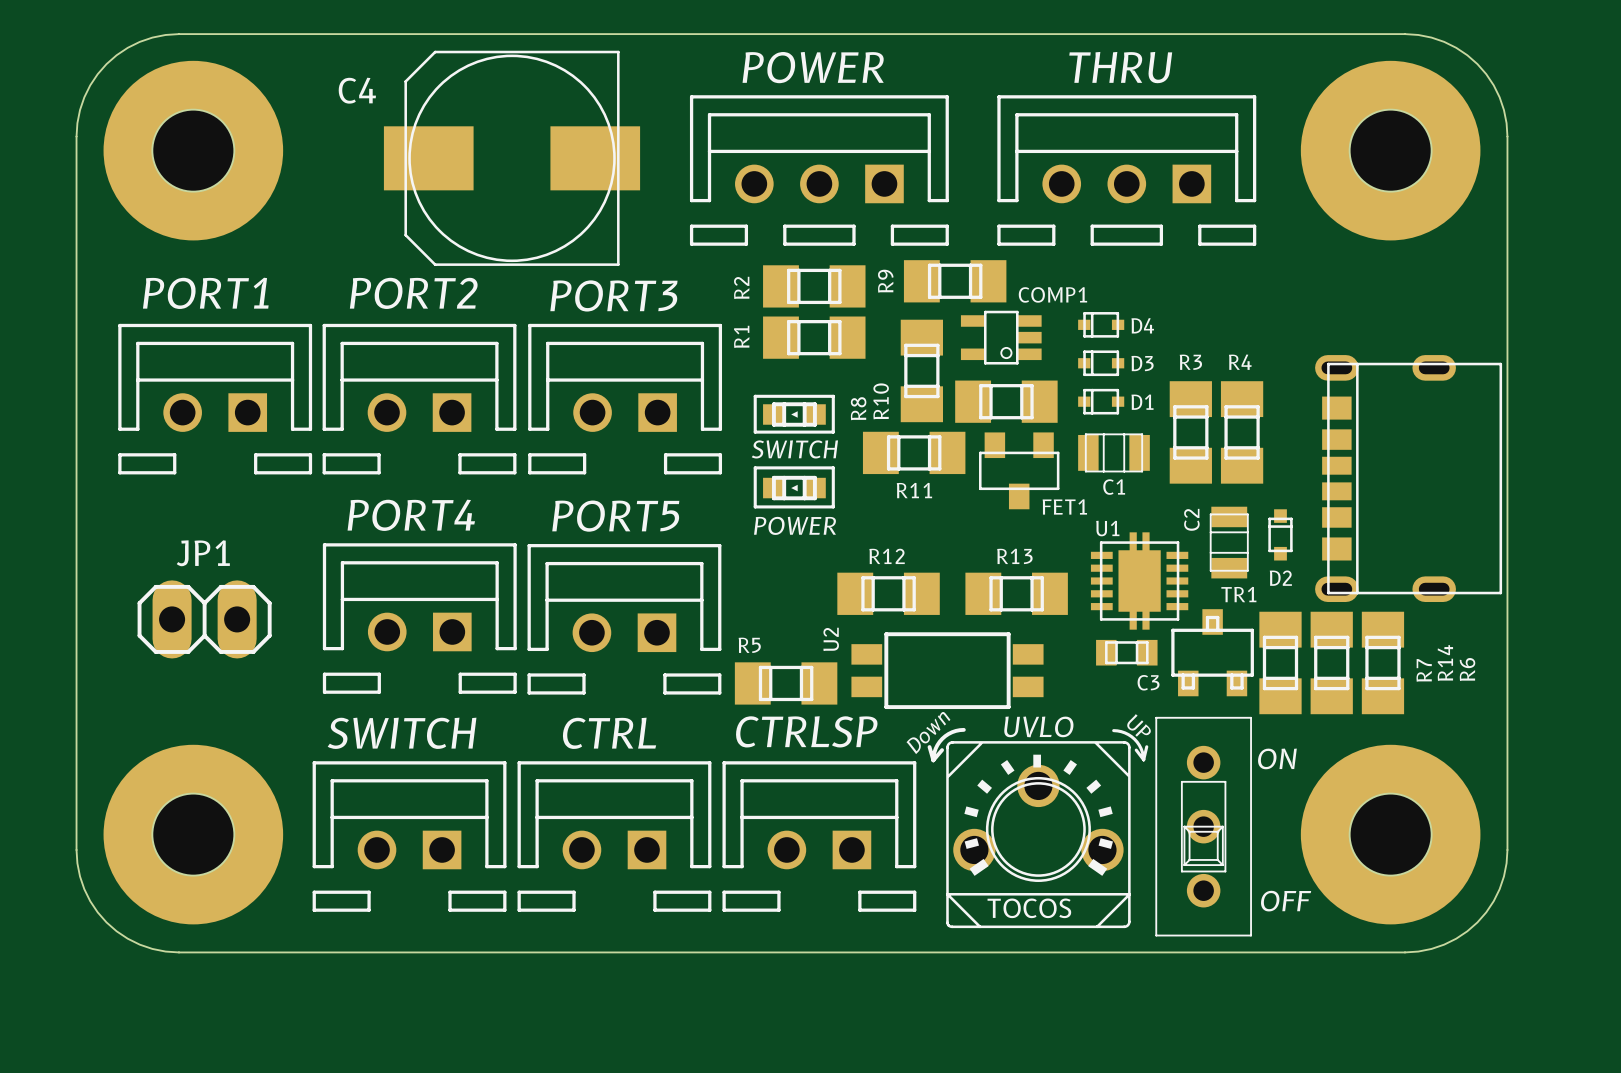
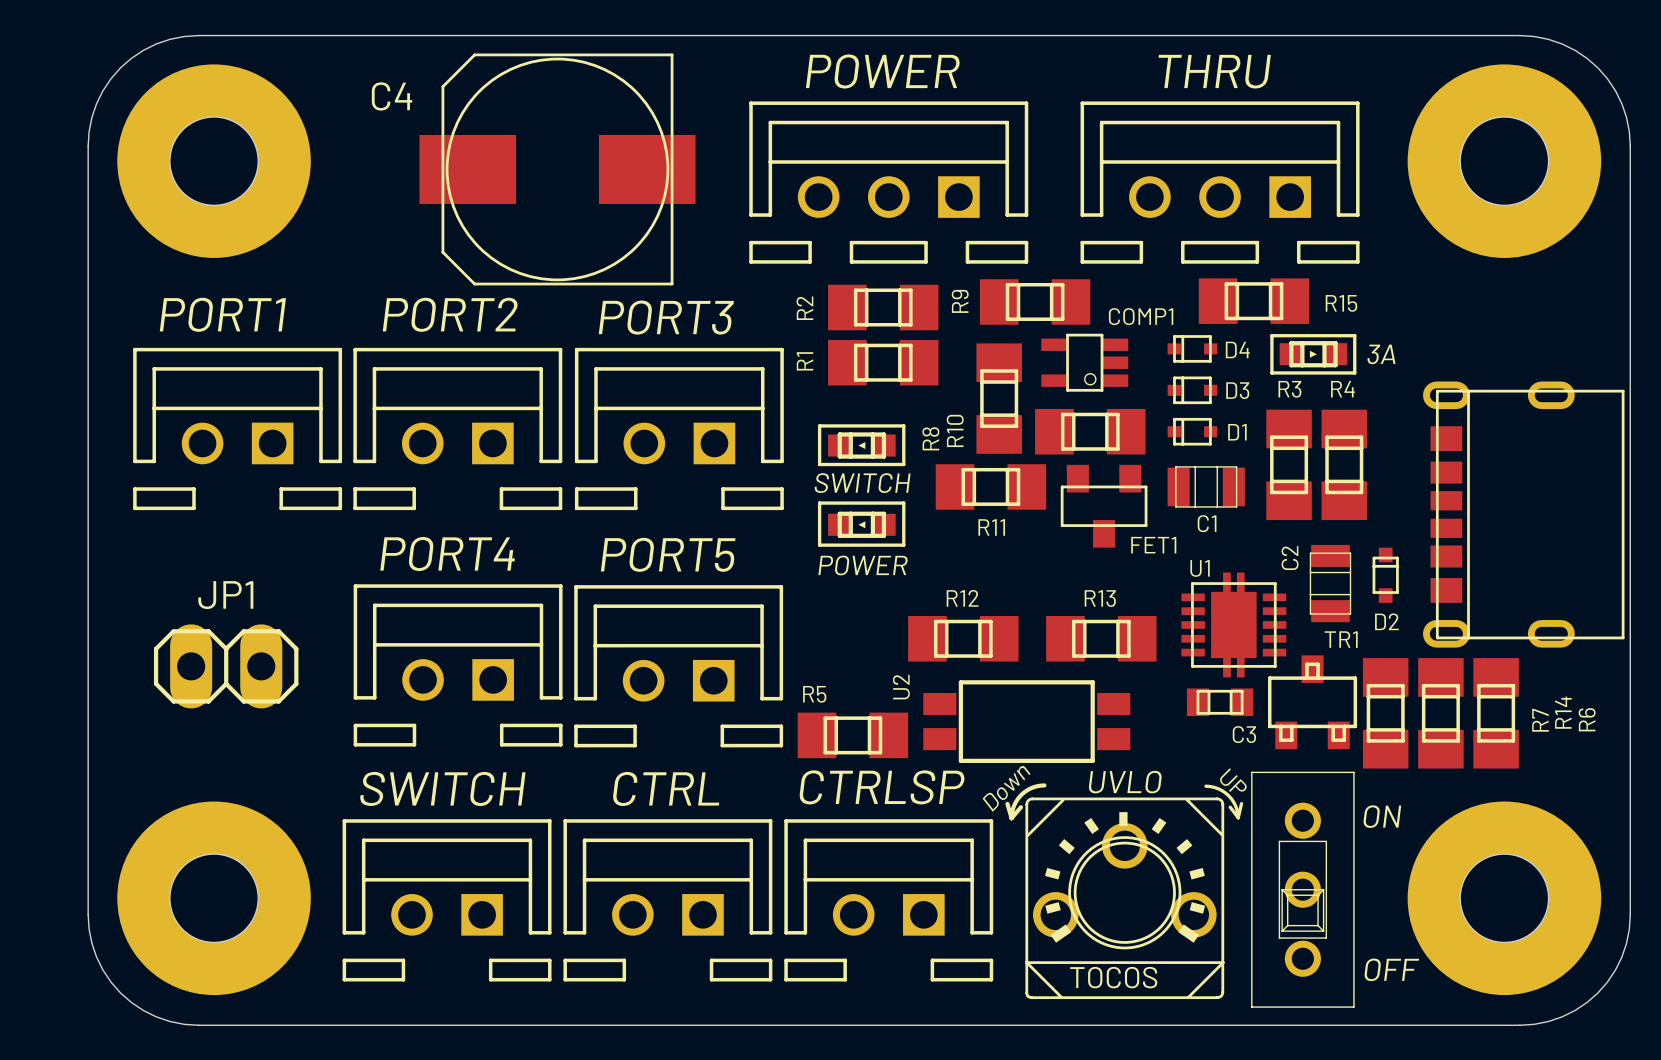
part: none -> (1253, 301)
text: none -> R15 (1341, 303)
line: none -> (1271, 335) (1271, 372) (1354, 372) (1354, 335) (1271, 335)
part: none -> (1313, 354)
text: none -> 3A (1381, 354)

